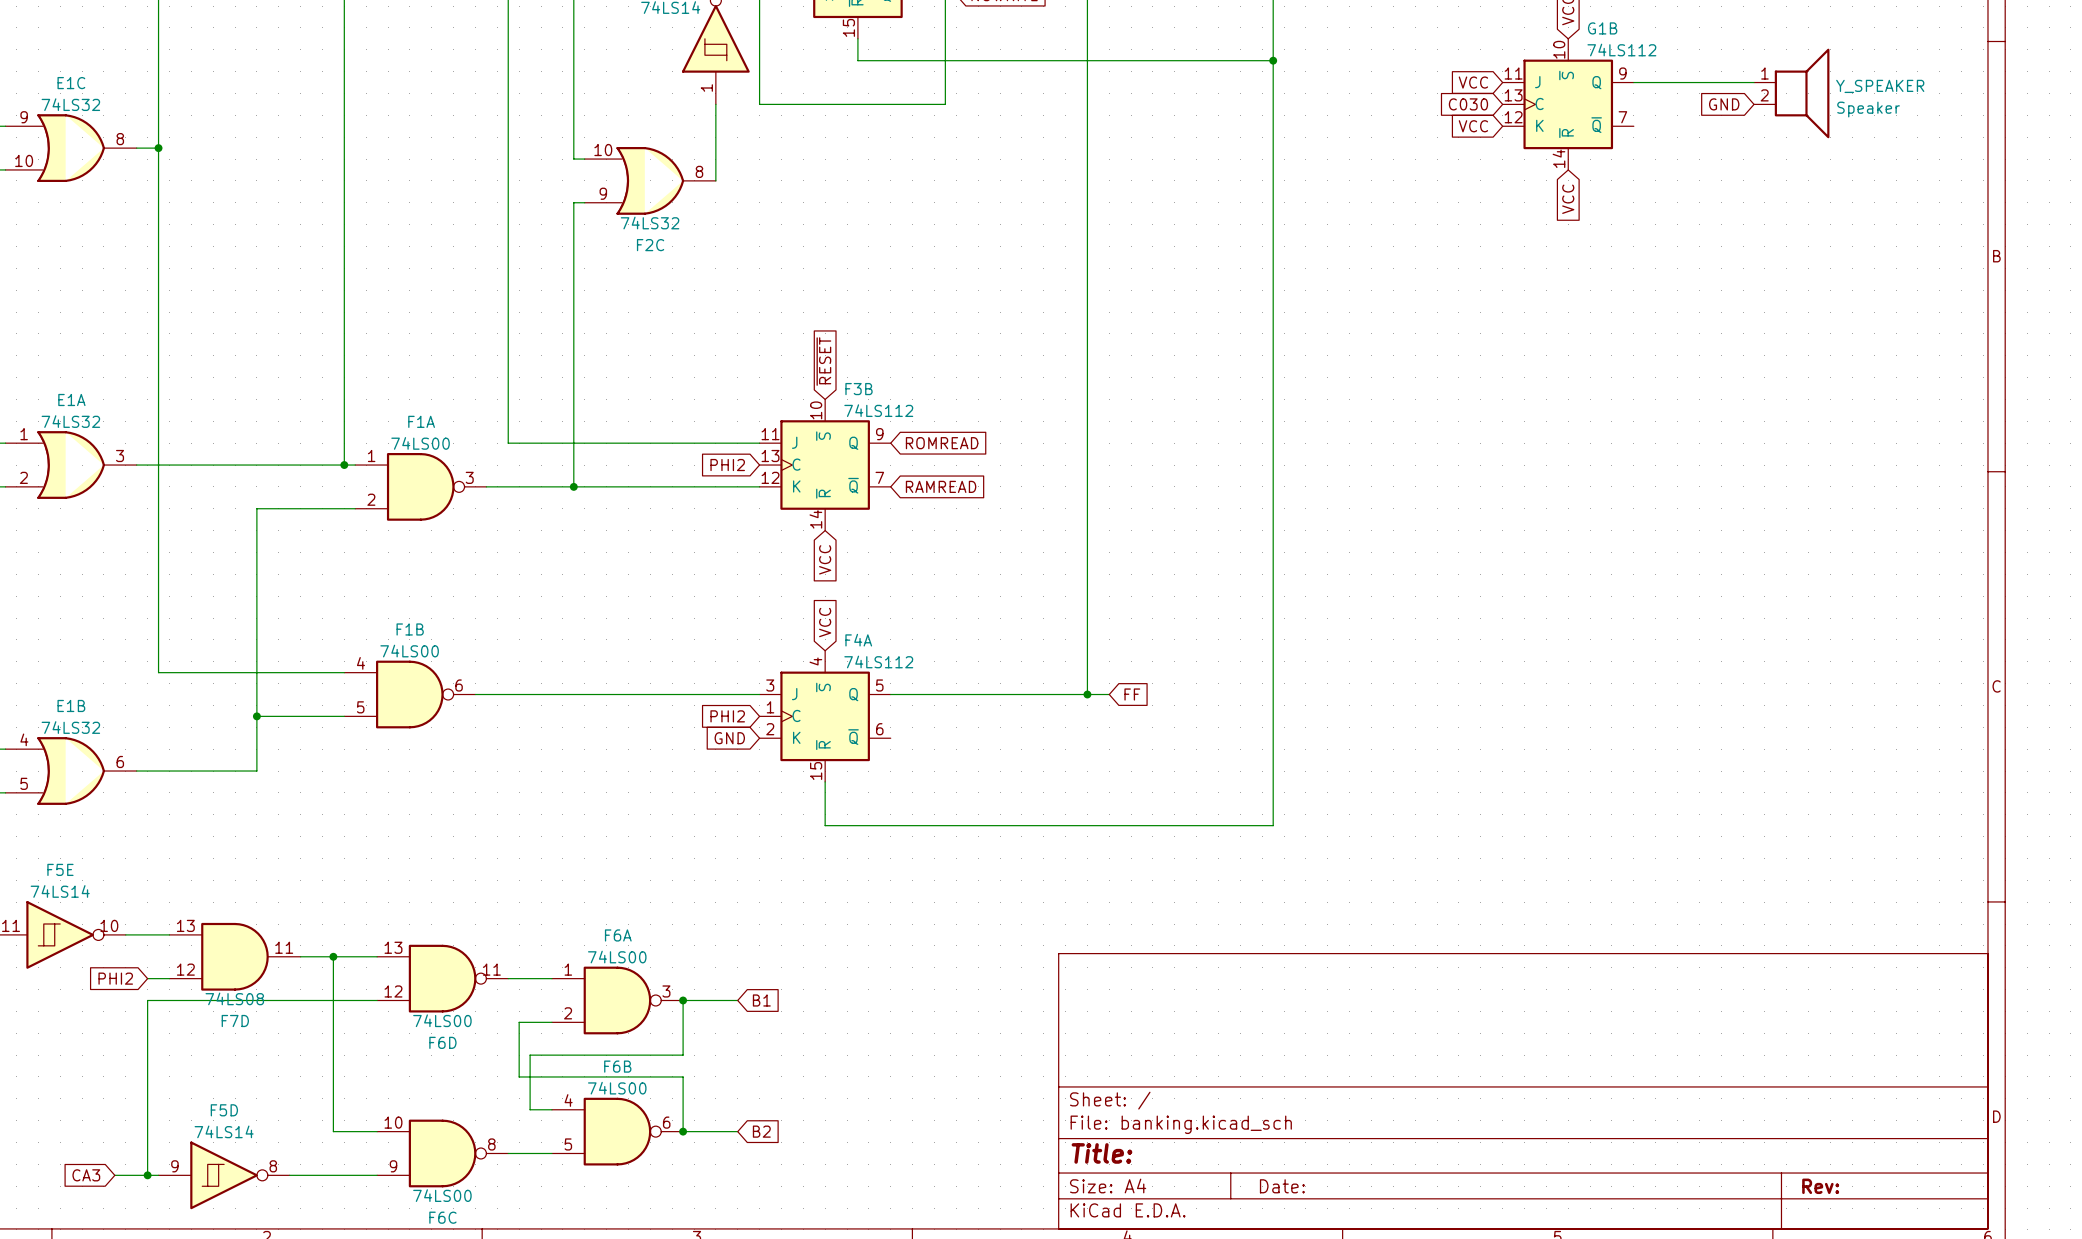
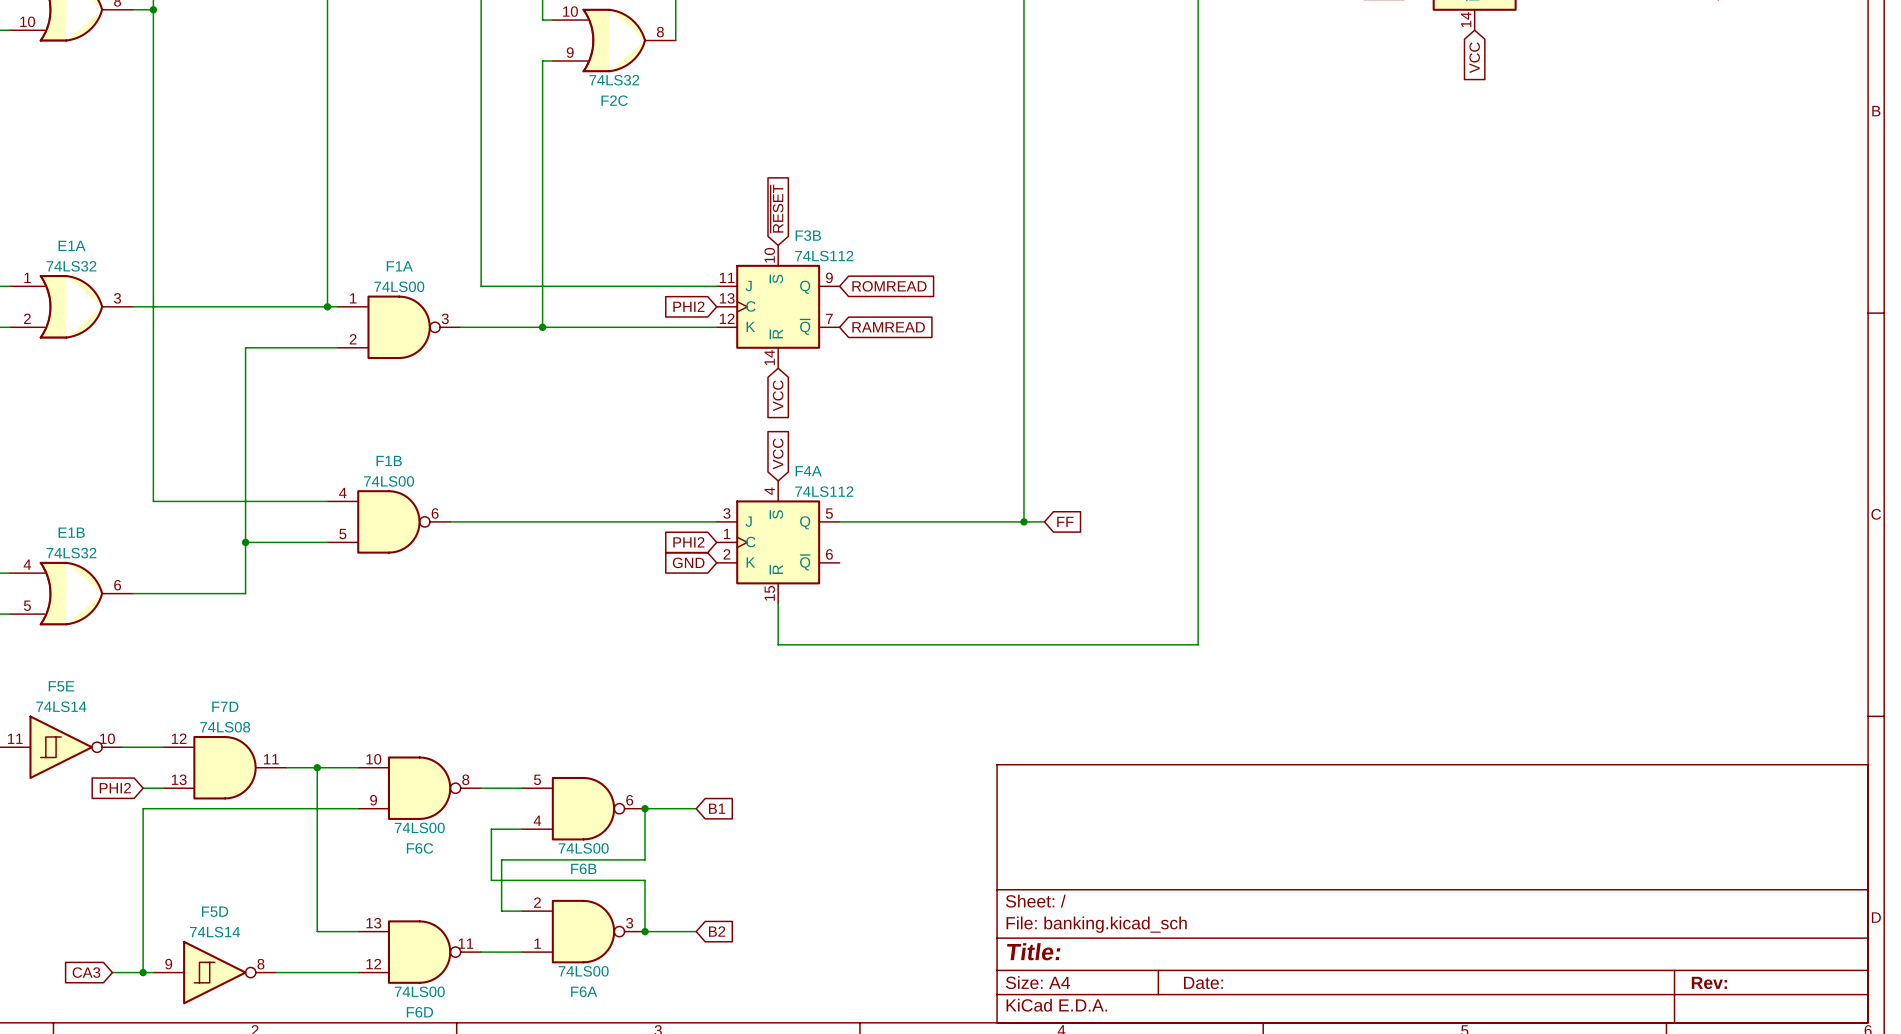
F7D flip: as is (234, 956) -> up-down (225, 767)
F6D position: (442, 978) -> (419, 952)
F6A flip: as is (617, 1000) -> up-down (583, 931)
F6A position: (617, 1000) -> (583, 931)
F6B flip: as is (617, 1131) -> up-down (583, 808)
F6B position: (617, 1131) -> (583, 808)
F6C position: (442, 1153) -> (419, 788)

